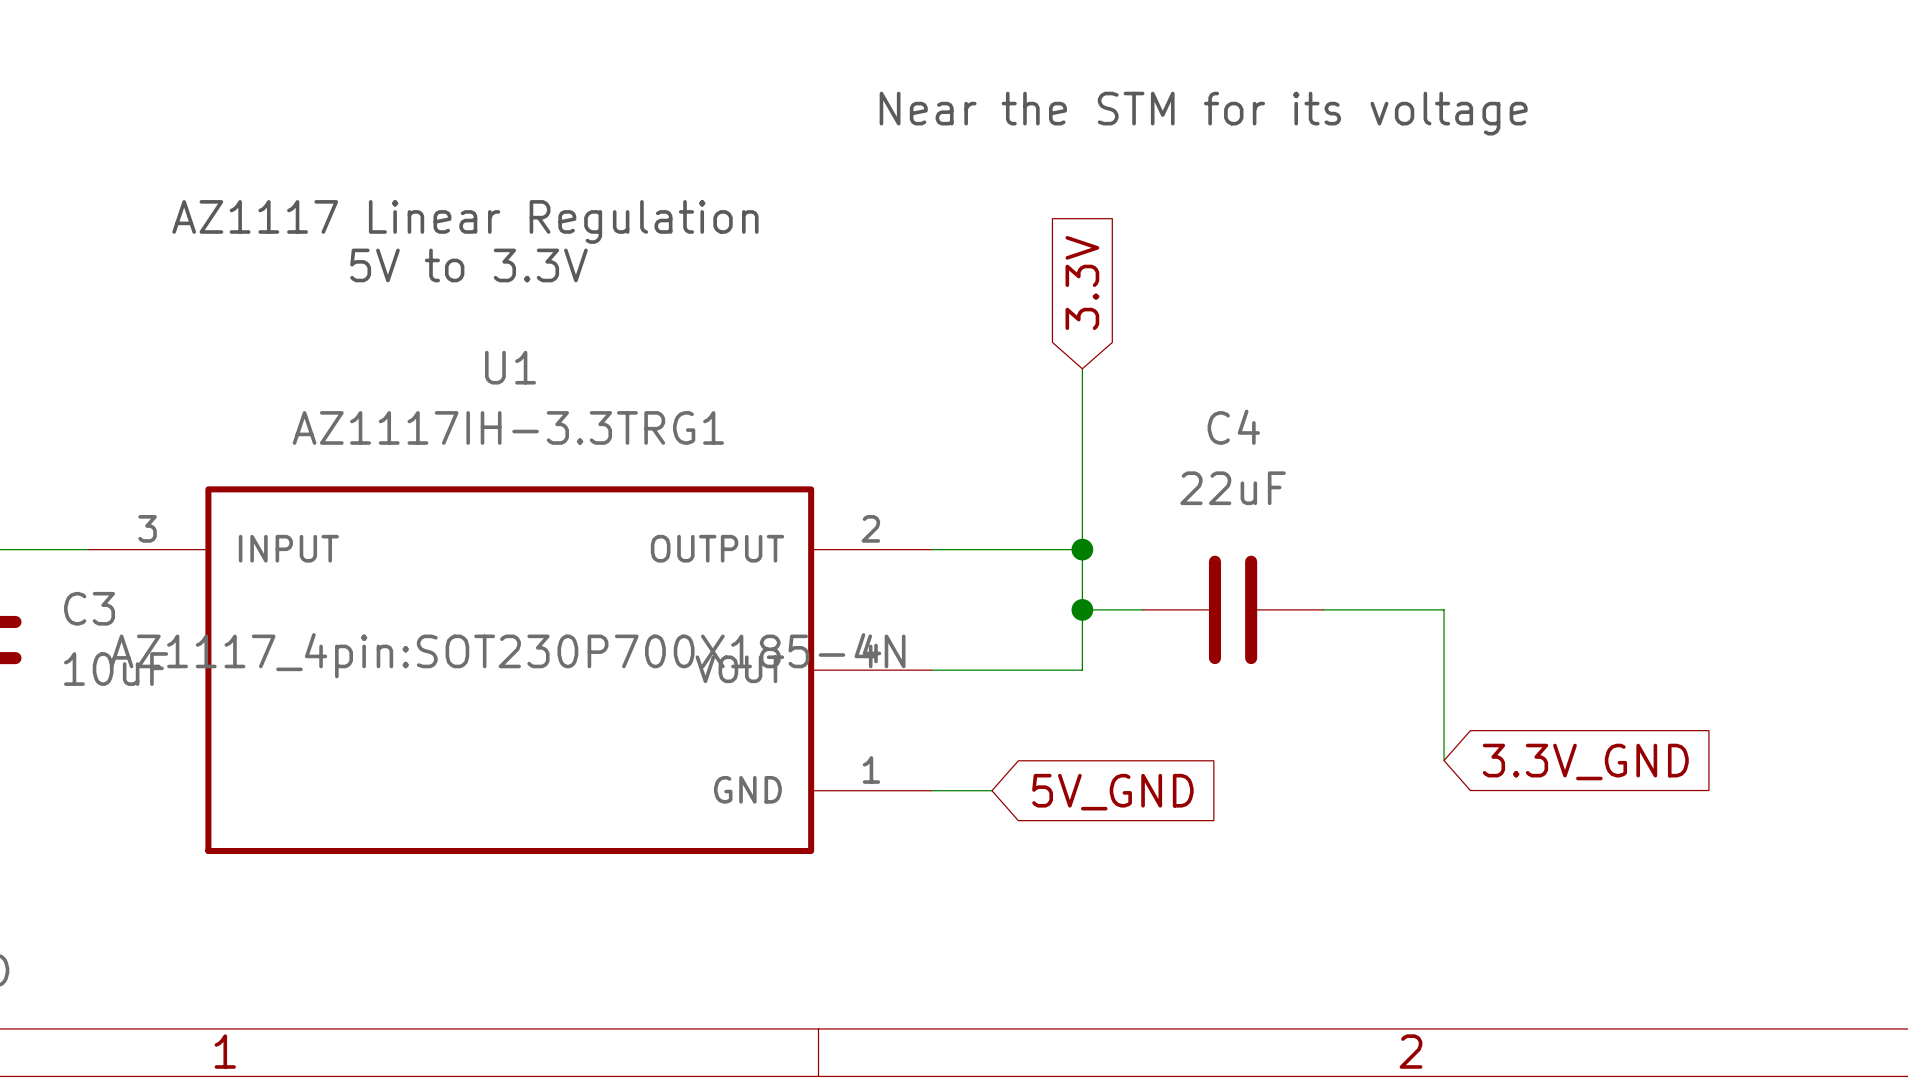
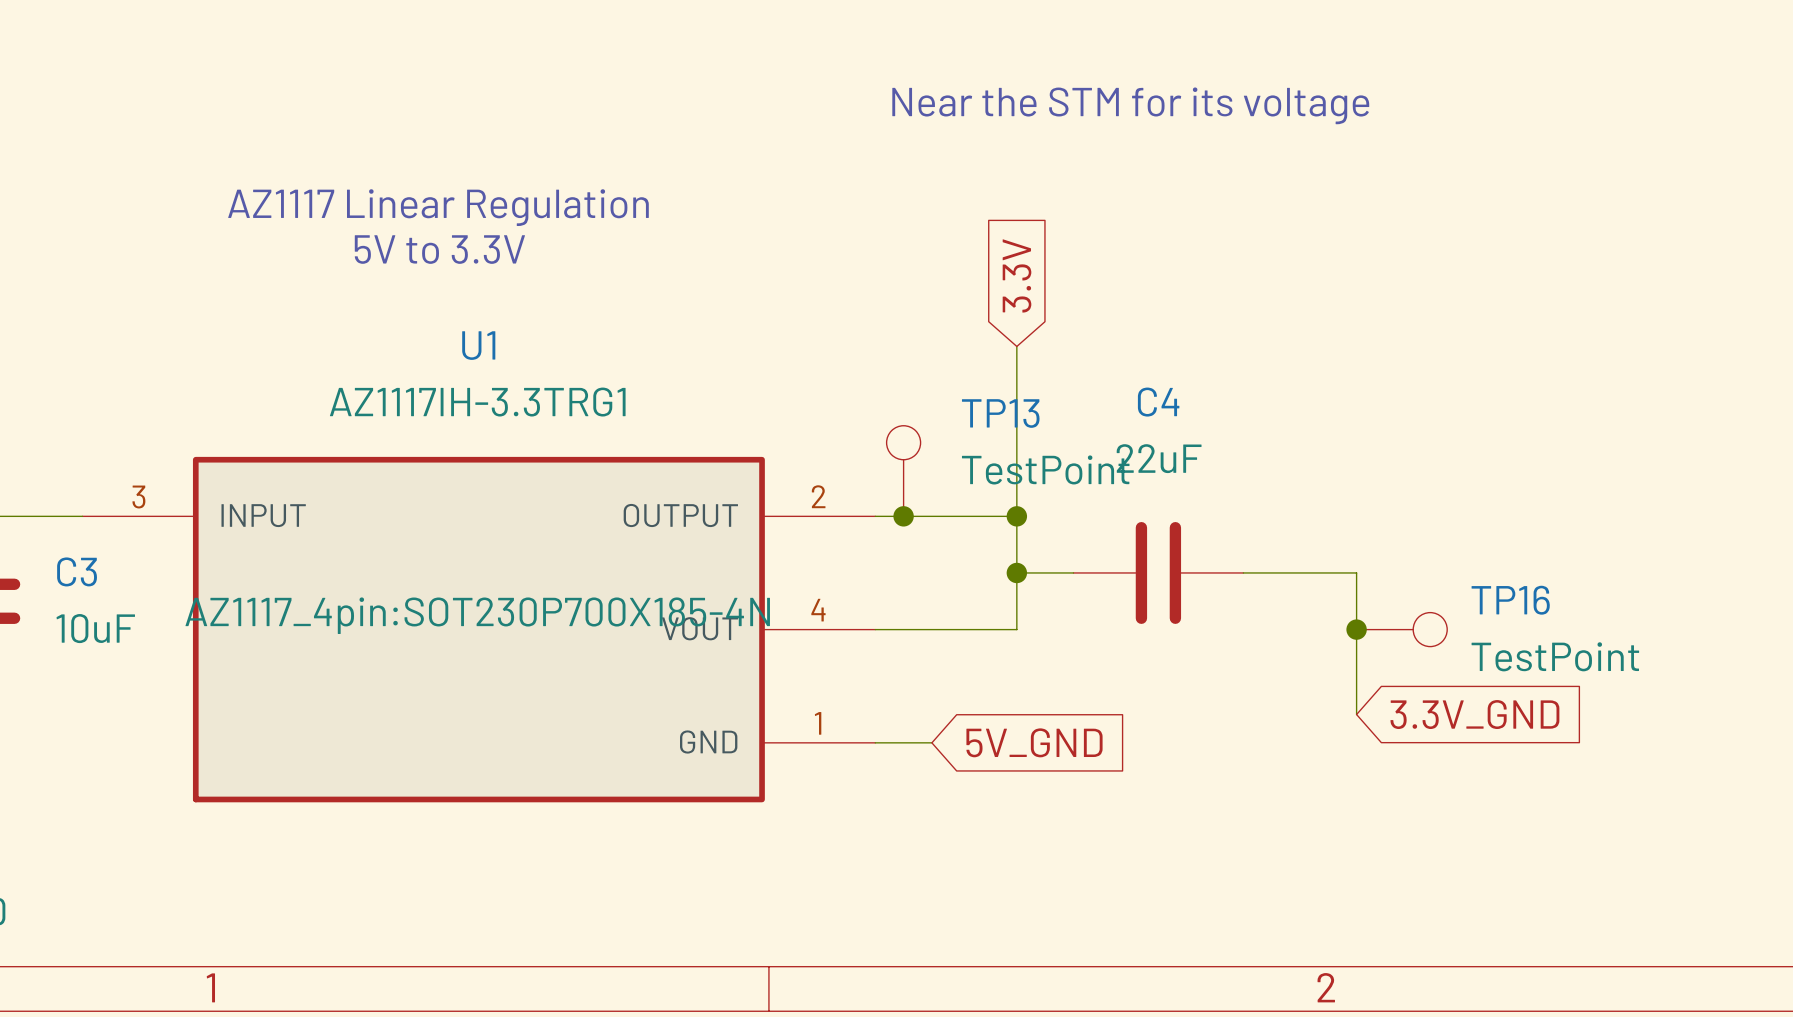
TP13: none -> TestPoint (903, 471)
junction: none -> (903, 516)
junction: none -> (1356, 629)
TP16: none -> TestPoint (1401, 629)

